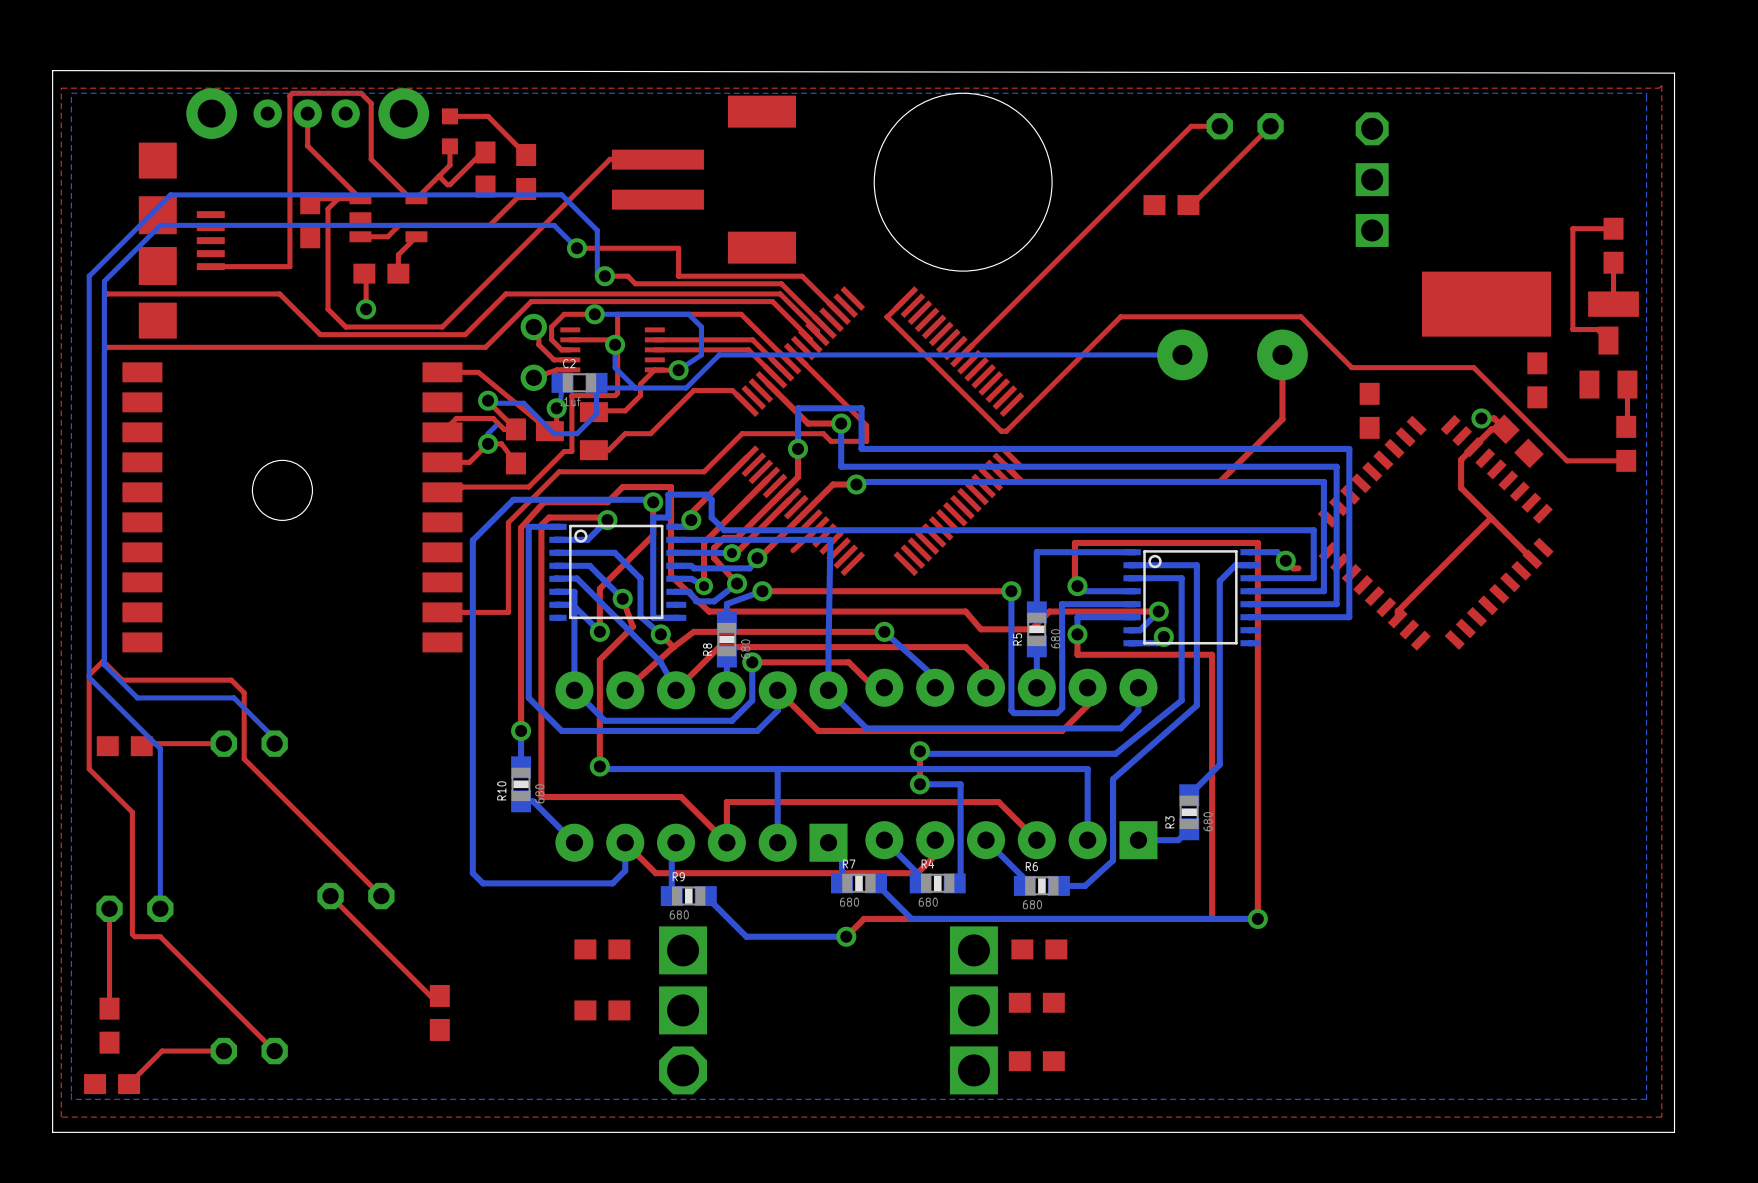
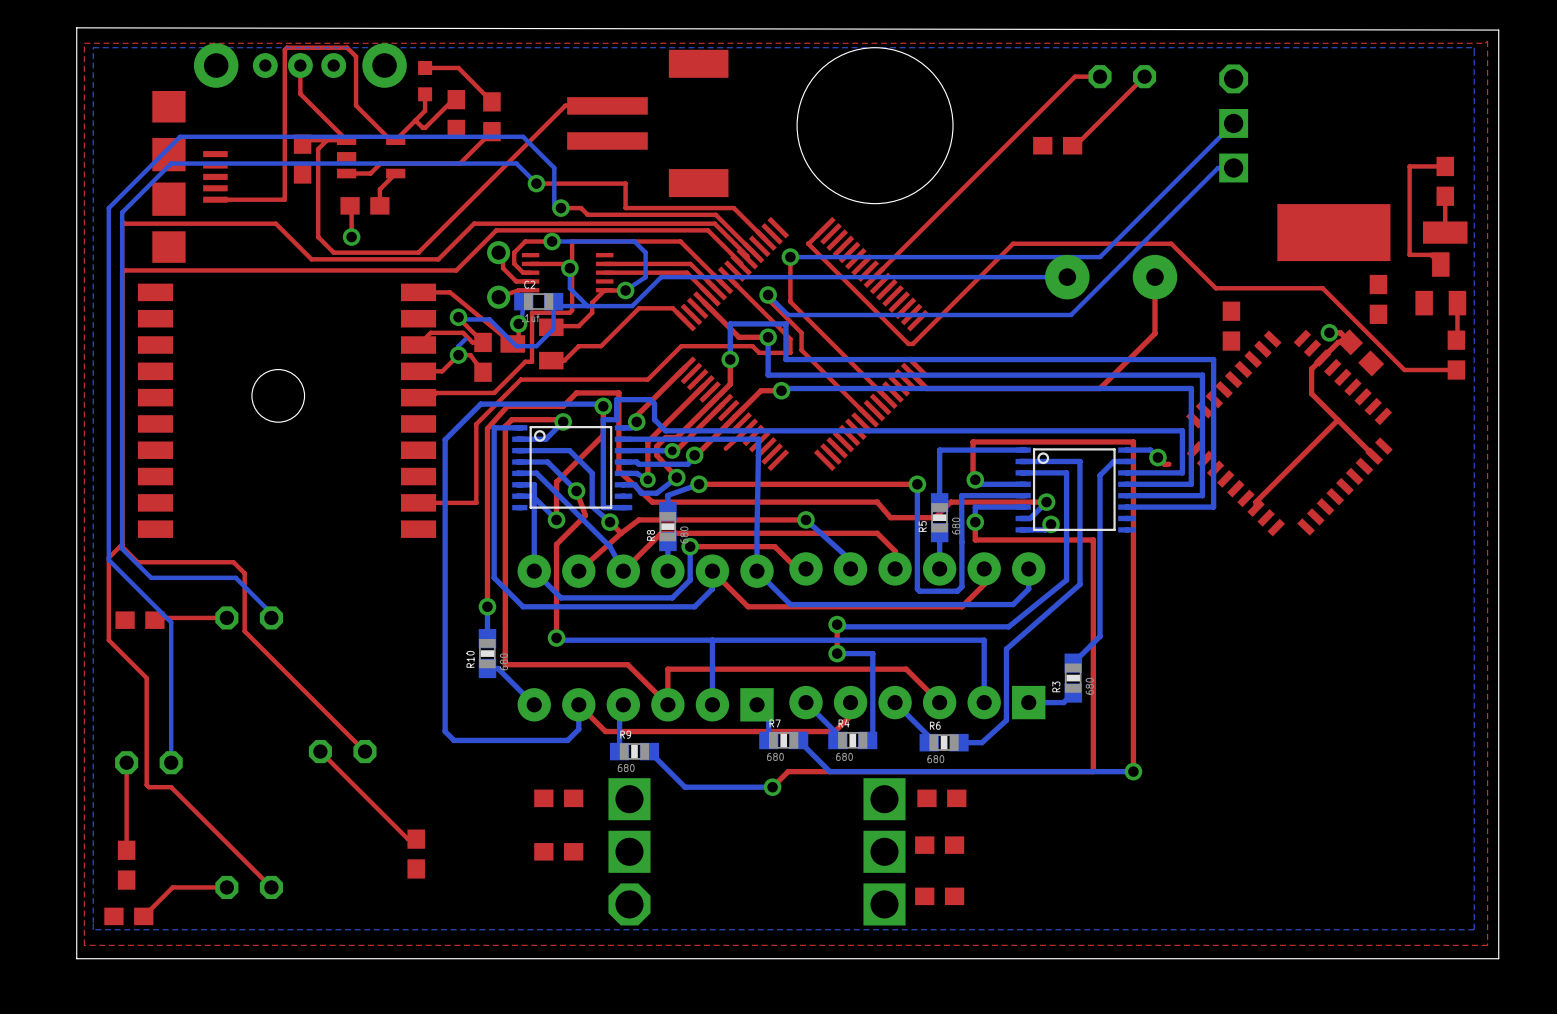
bottom track: none -> (1233, 123) (1100, 257) (790, 257)
bottom track: none -> (1233, 168) (1218, 168) (1071, 315) (788, 315) (768, 294)
top track: none -> (790, 257) (790, 301) (886, 398)
via: none -> (790, 257)
top track: none -> (768, 294) (768, 299) (801, 332) (801, 350) (868, 416)
via: none -> (768, 294)

